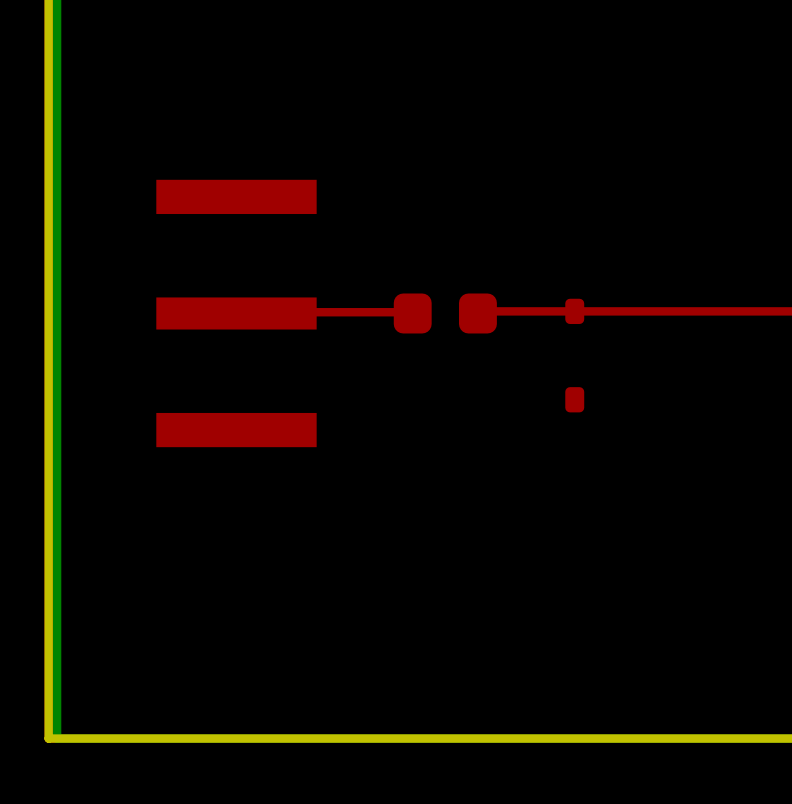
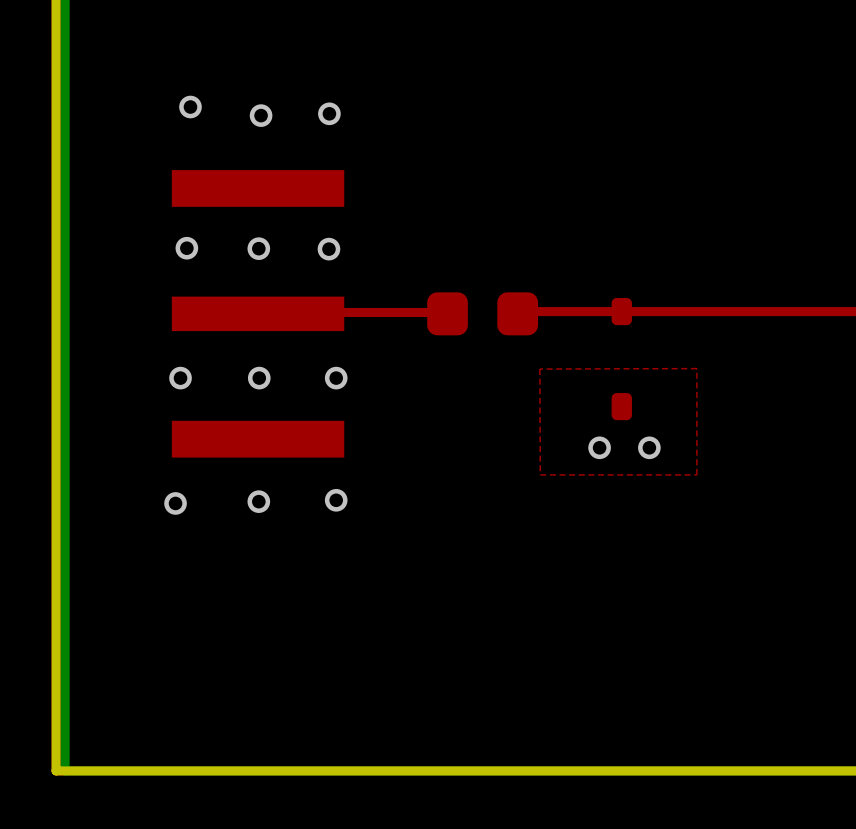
via: none -> (190, 107)
via: none -> (329, 113)
via: none -> (261, 115)
via: none -> (186, 248)
via: none -> (258, 248)
via: none -> (328, 249)
top zone outline: none -> (696, 368) (539, 369) (540, 474) (696, 474) (696, 368)
via: none -> (180, 378)
via: none -> (259, 378)
via: none -> (336, 378)
via: none -> (599, 447)
via: none -> (649, 447)
via: none -> (336, 500)
via: none -> (258, 501)
via: none -> (175, 503)

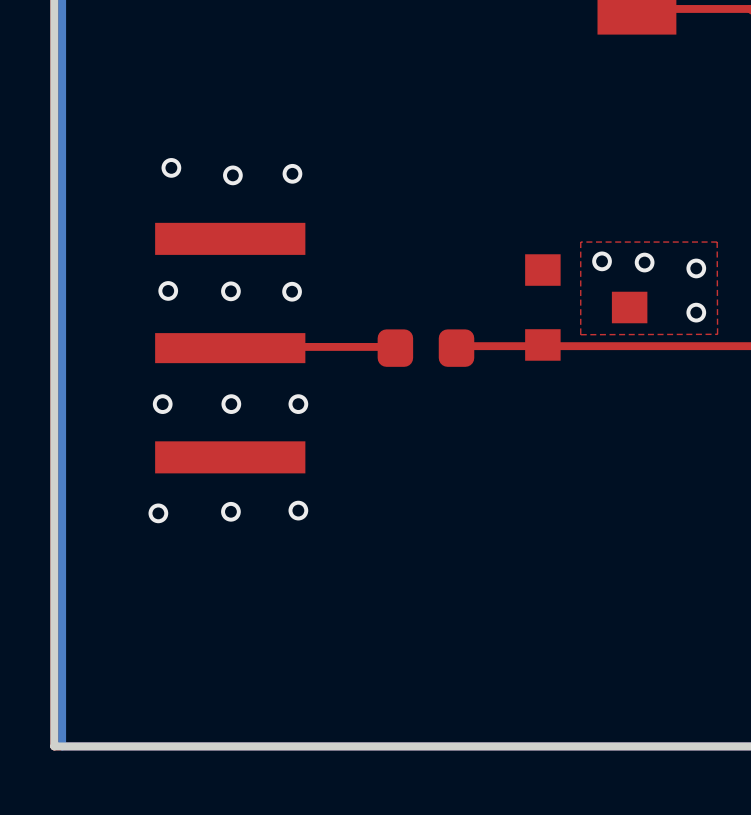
via: none -> (602, 261)
via: none -> (644, 262)
via: none -> (696, 268)
part: none -> (586, 307)
via: none -> (696, 312)
part: (621, 359) -> none
top zone outline: (696, 368) (539, 369) (540, 474) (696, 474) (696, 368) -> (717, 242) (580, 242) (580, 334) (717, 334) (717, 242)
via: (599, 447) -> none
via: (649, 447) -> none

